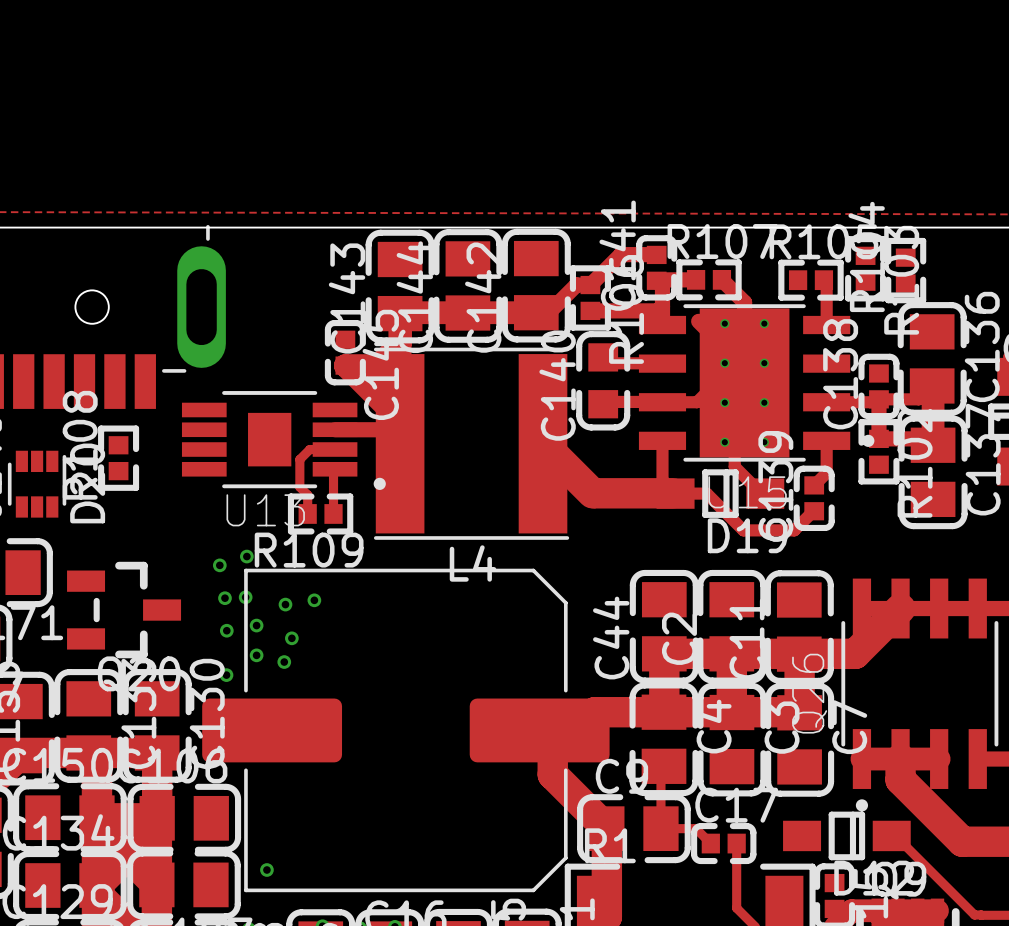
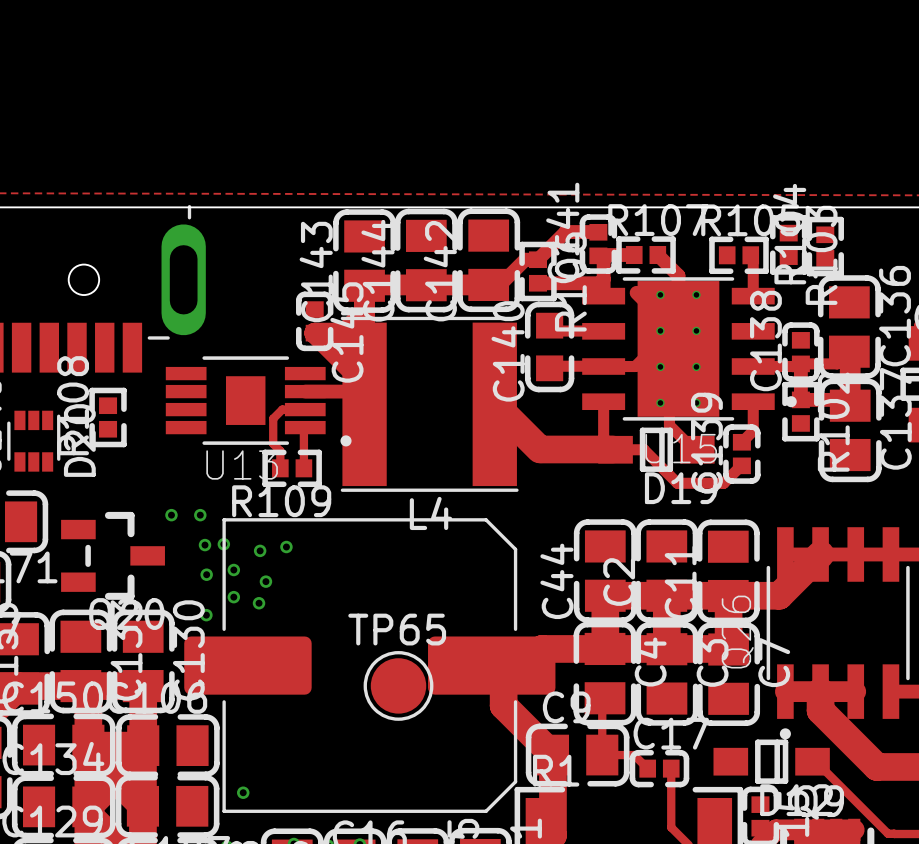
via position: (246, 556) -> (171, 515)
TP65: none -> (398, 685)

